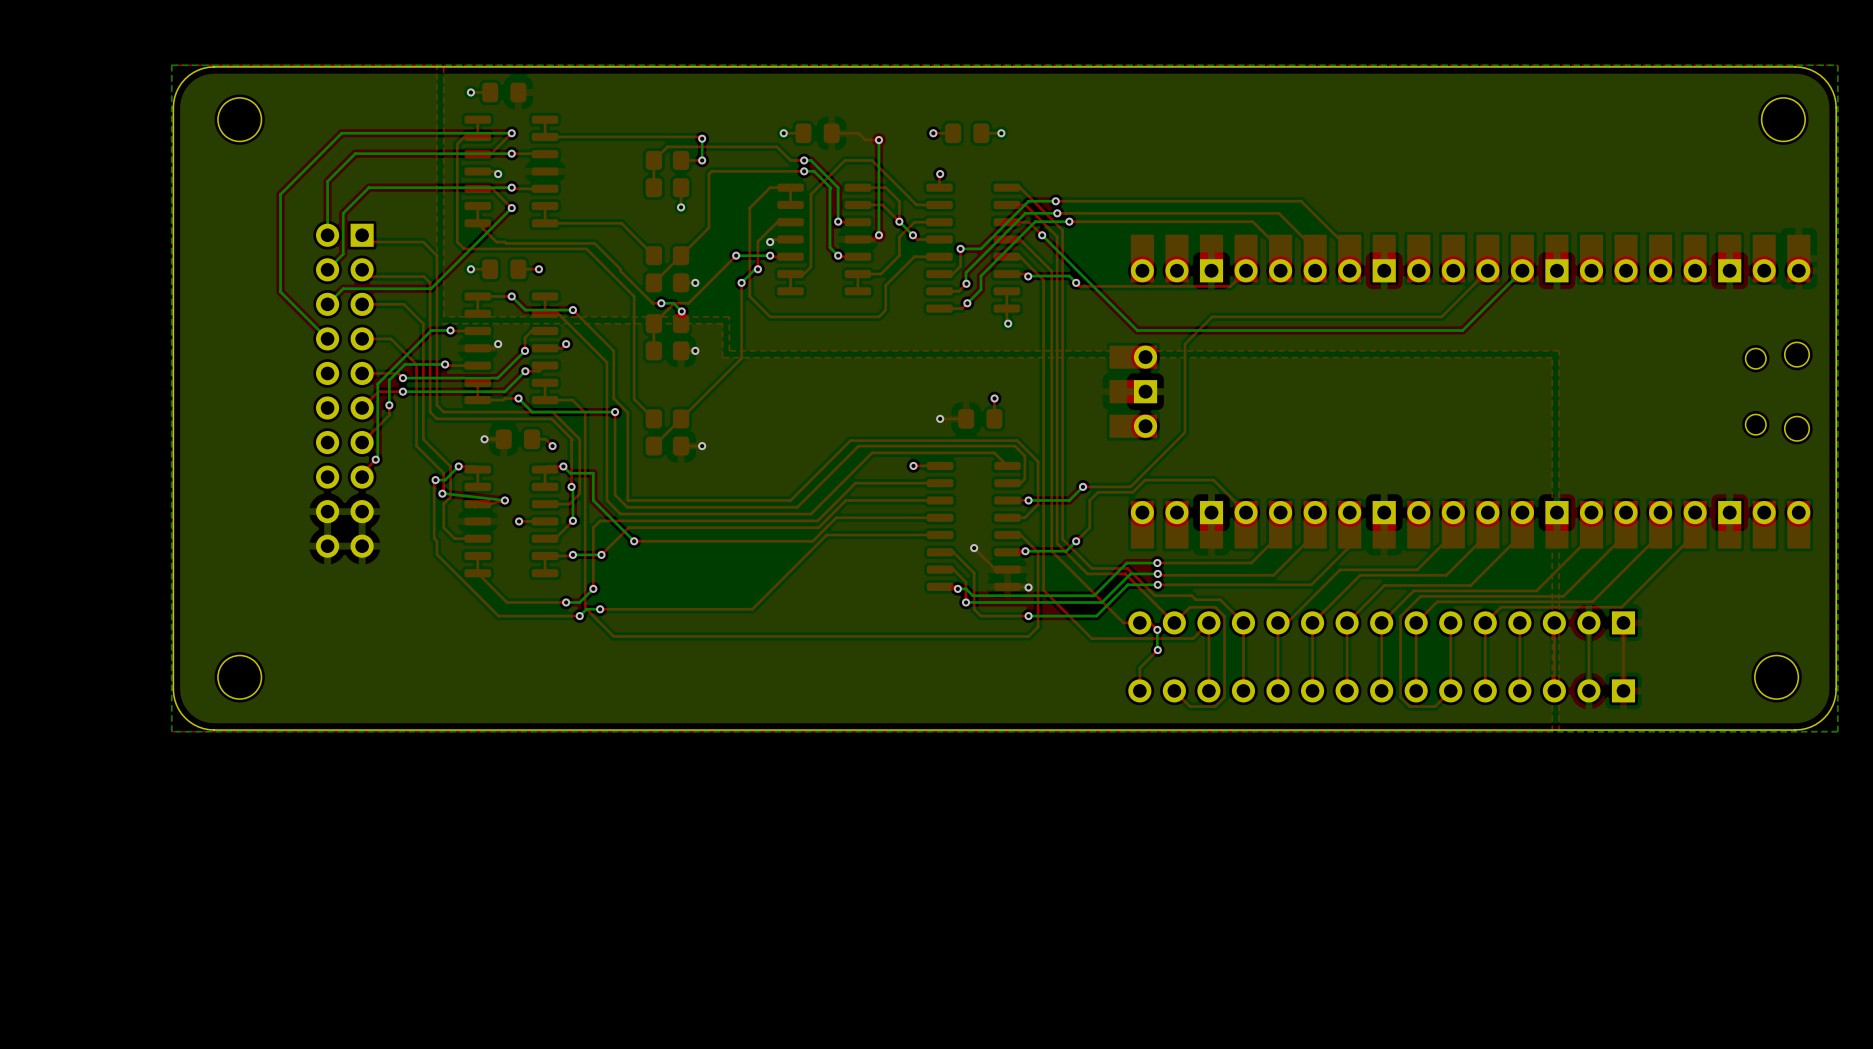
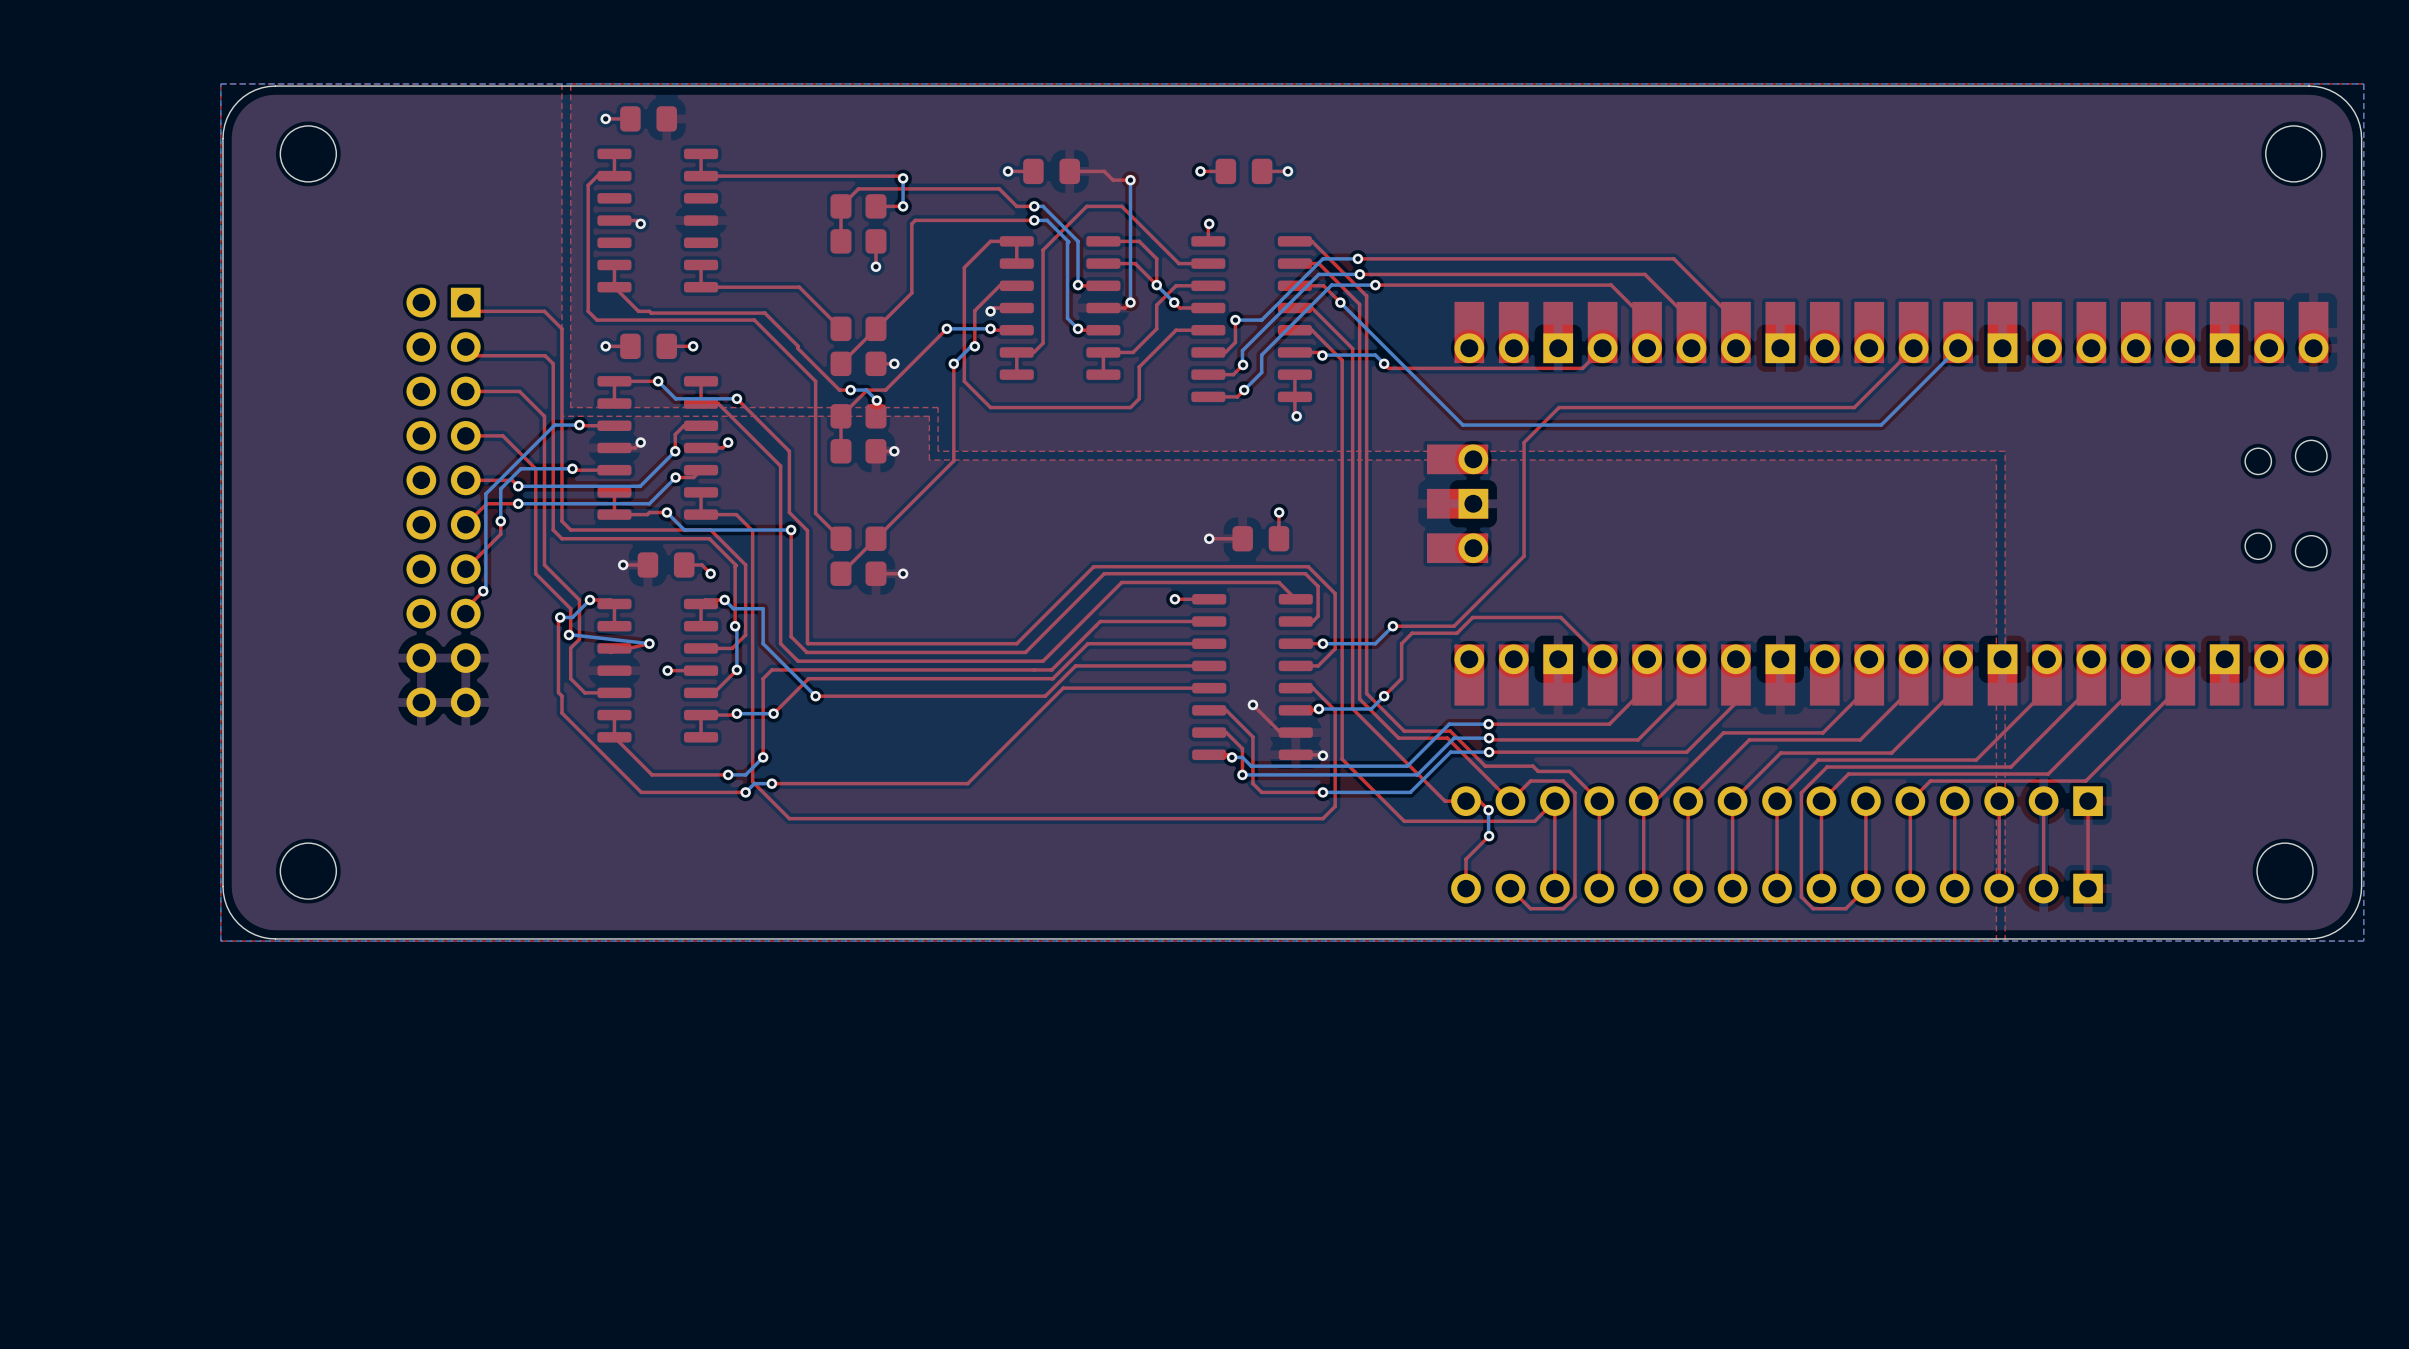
top track: (511, 133) (490, 154) (477, 154) -> none
bottom track: (511, 133) (341, 133) (280, 194) (280, 291) (327, 338) -> none
via: (511, 133) -> none
top track: (511, 153) (545, 154) -> none
bottom track: (511, 153) (355, 153) (327, 181) (327, 235) -> none
via: (511, 153) -> none
top track: (511, 187) (545, 188) -> none
bottom track: (511, 187) (368, 187) (343, 213) (343, 254) (327, 269) -> none
via: (511, 187) -> none
top track: (477, 188) (492, 188) (511, 208) -> none
bottom track: (511, 208) (431, 288) (343, 288) (327, 304) -> none
via: (511, 208) -> none

